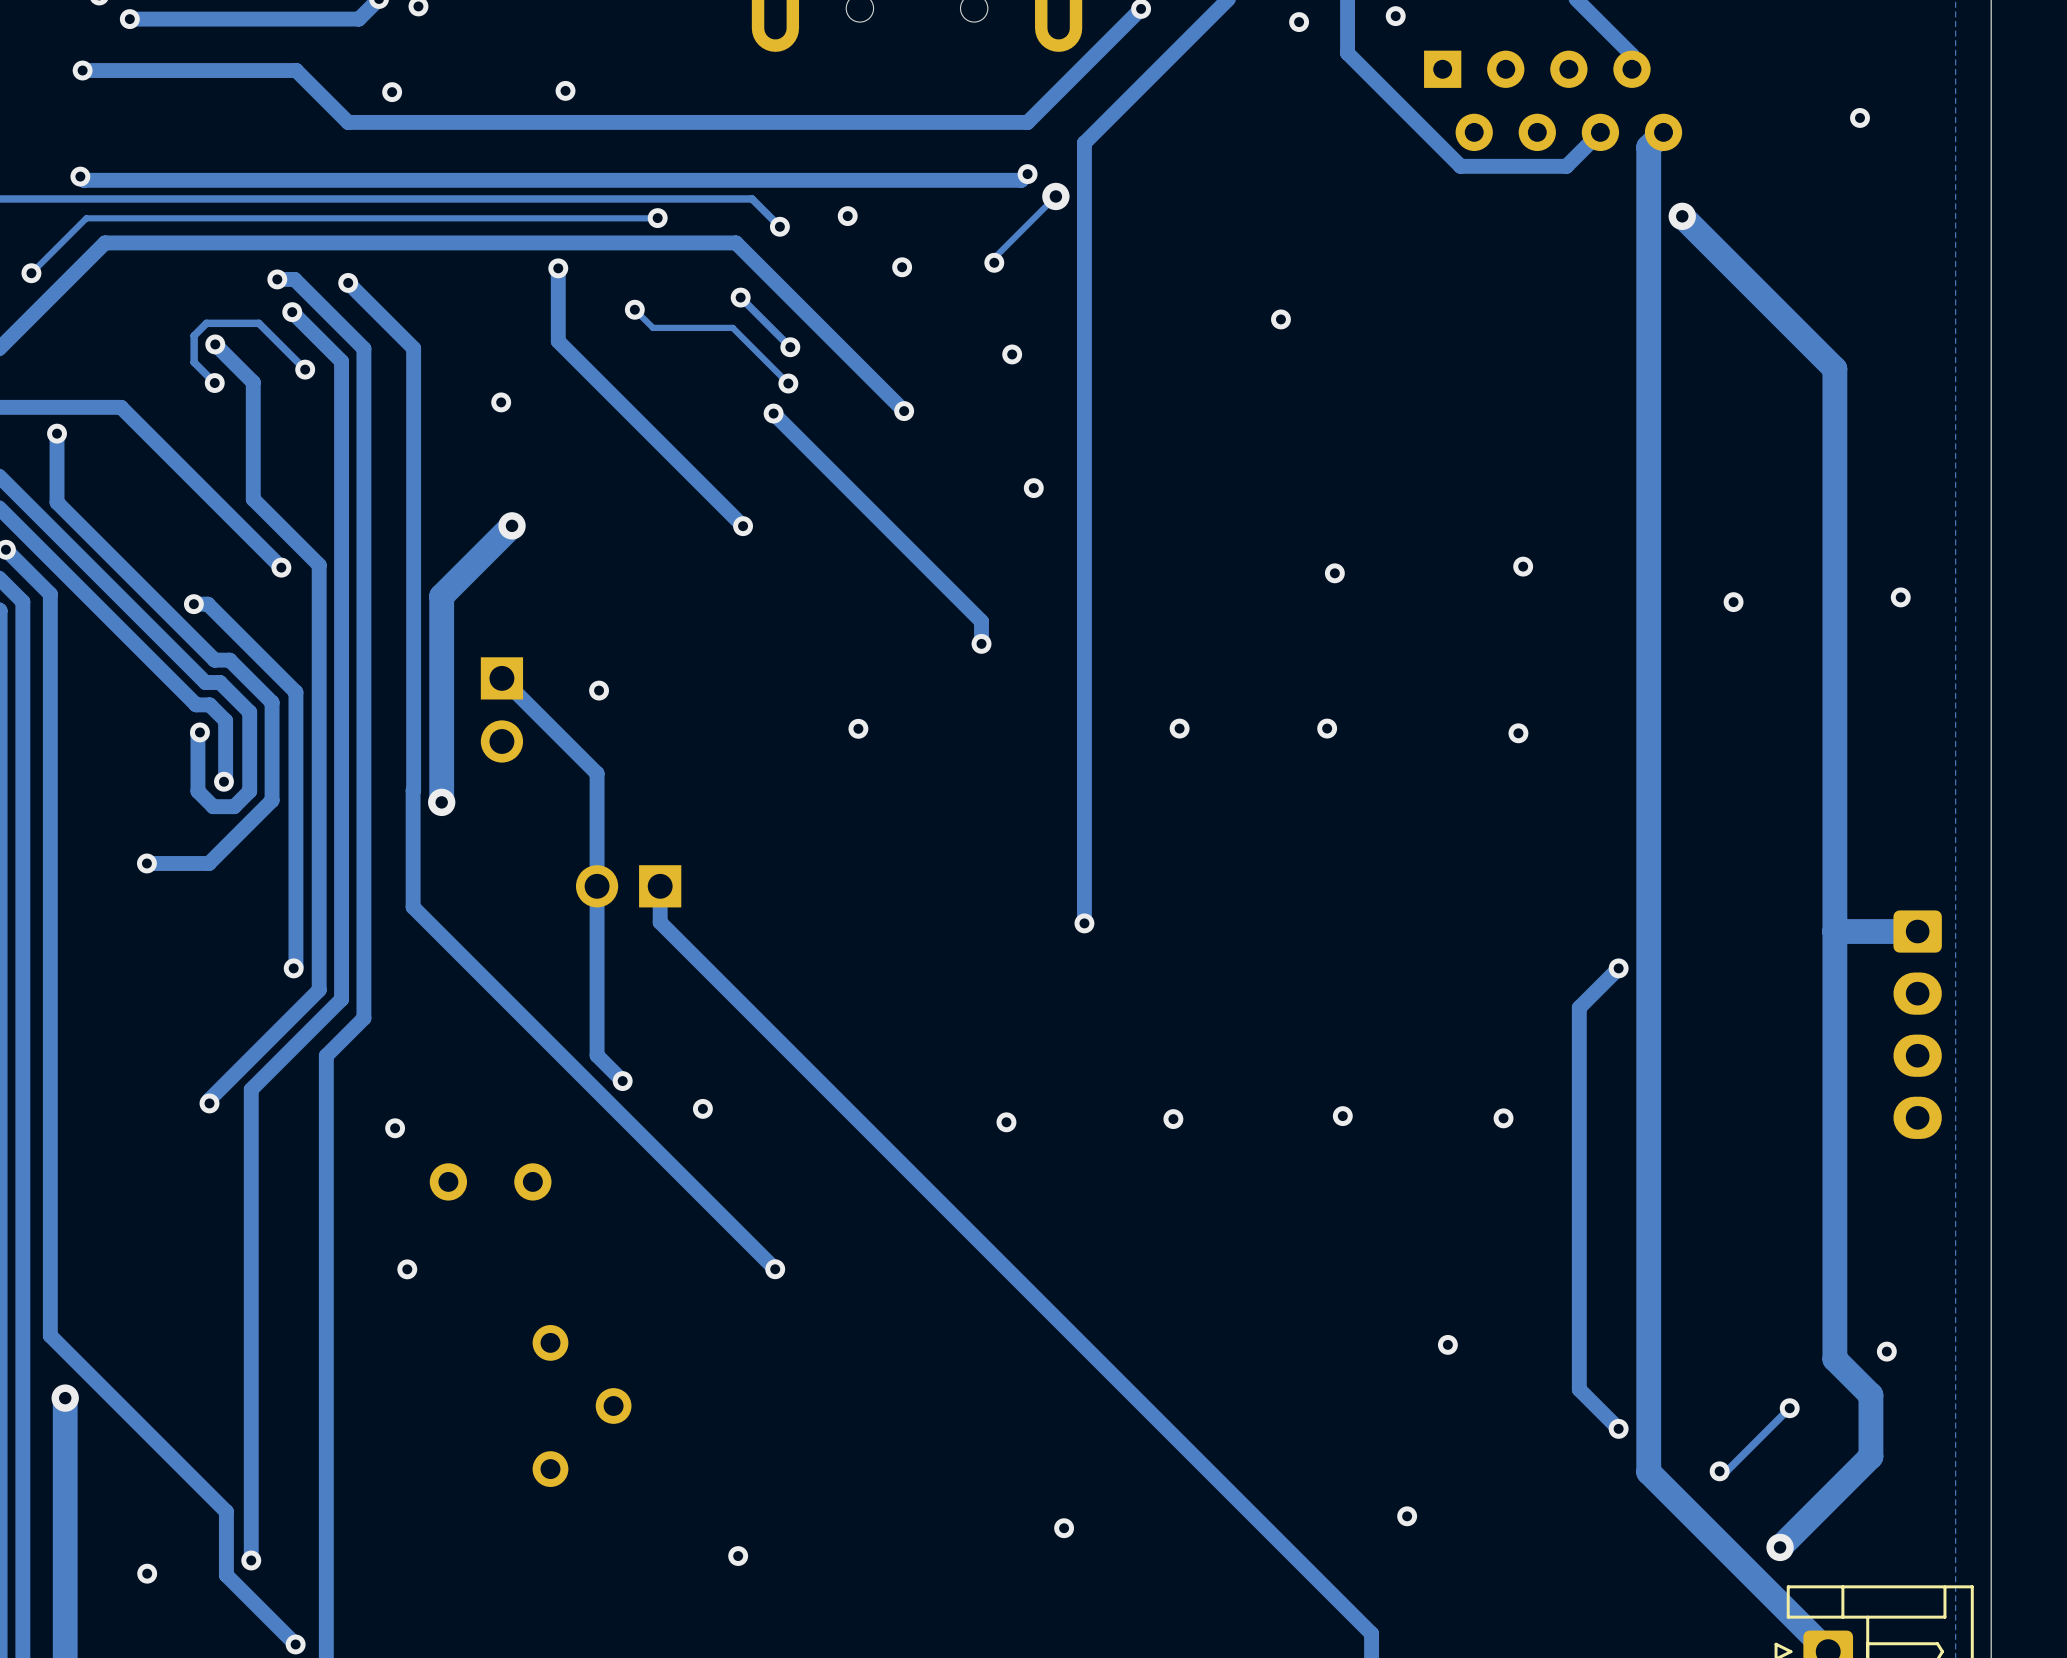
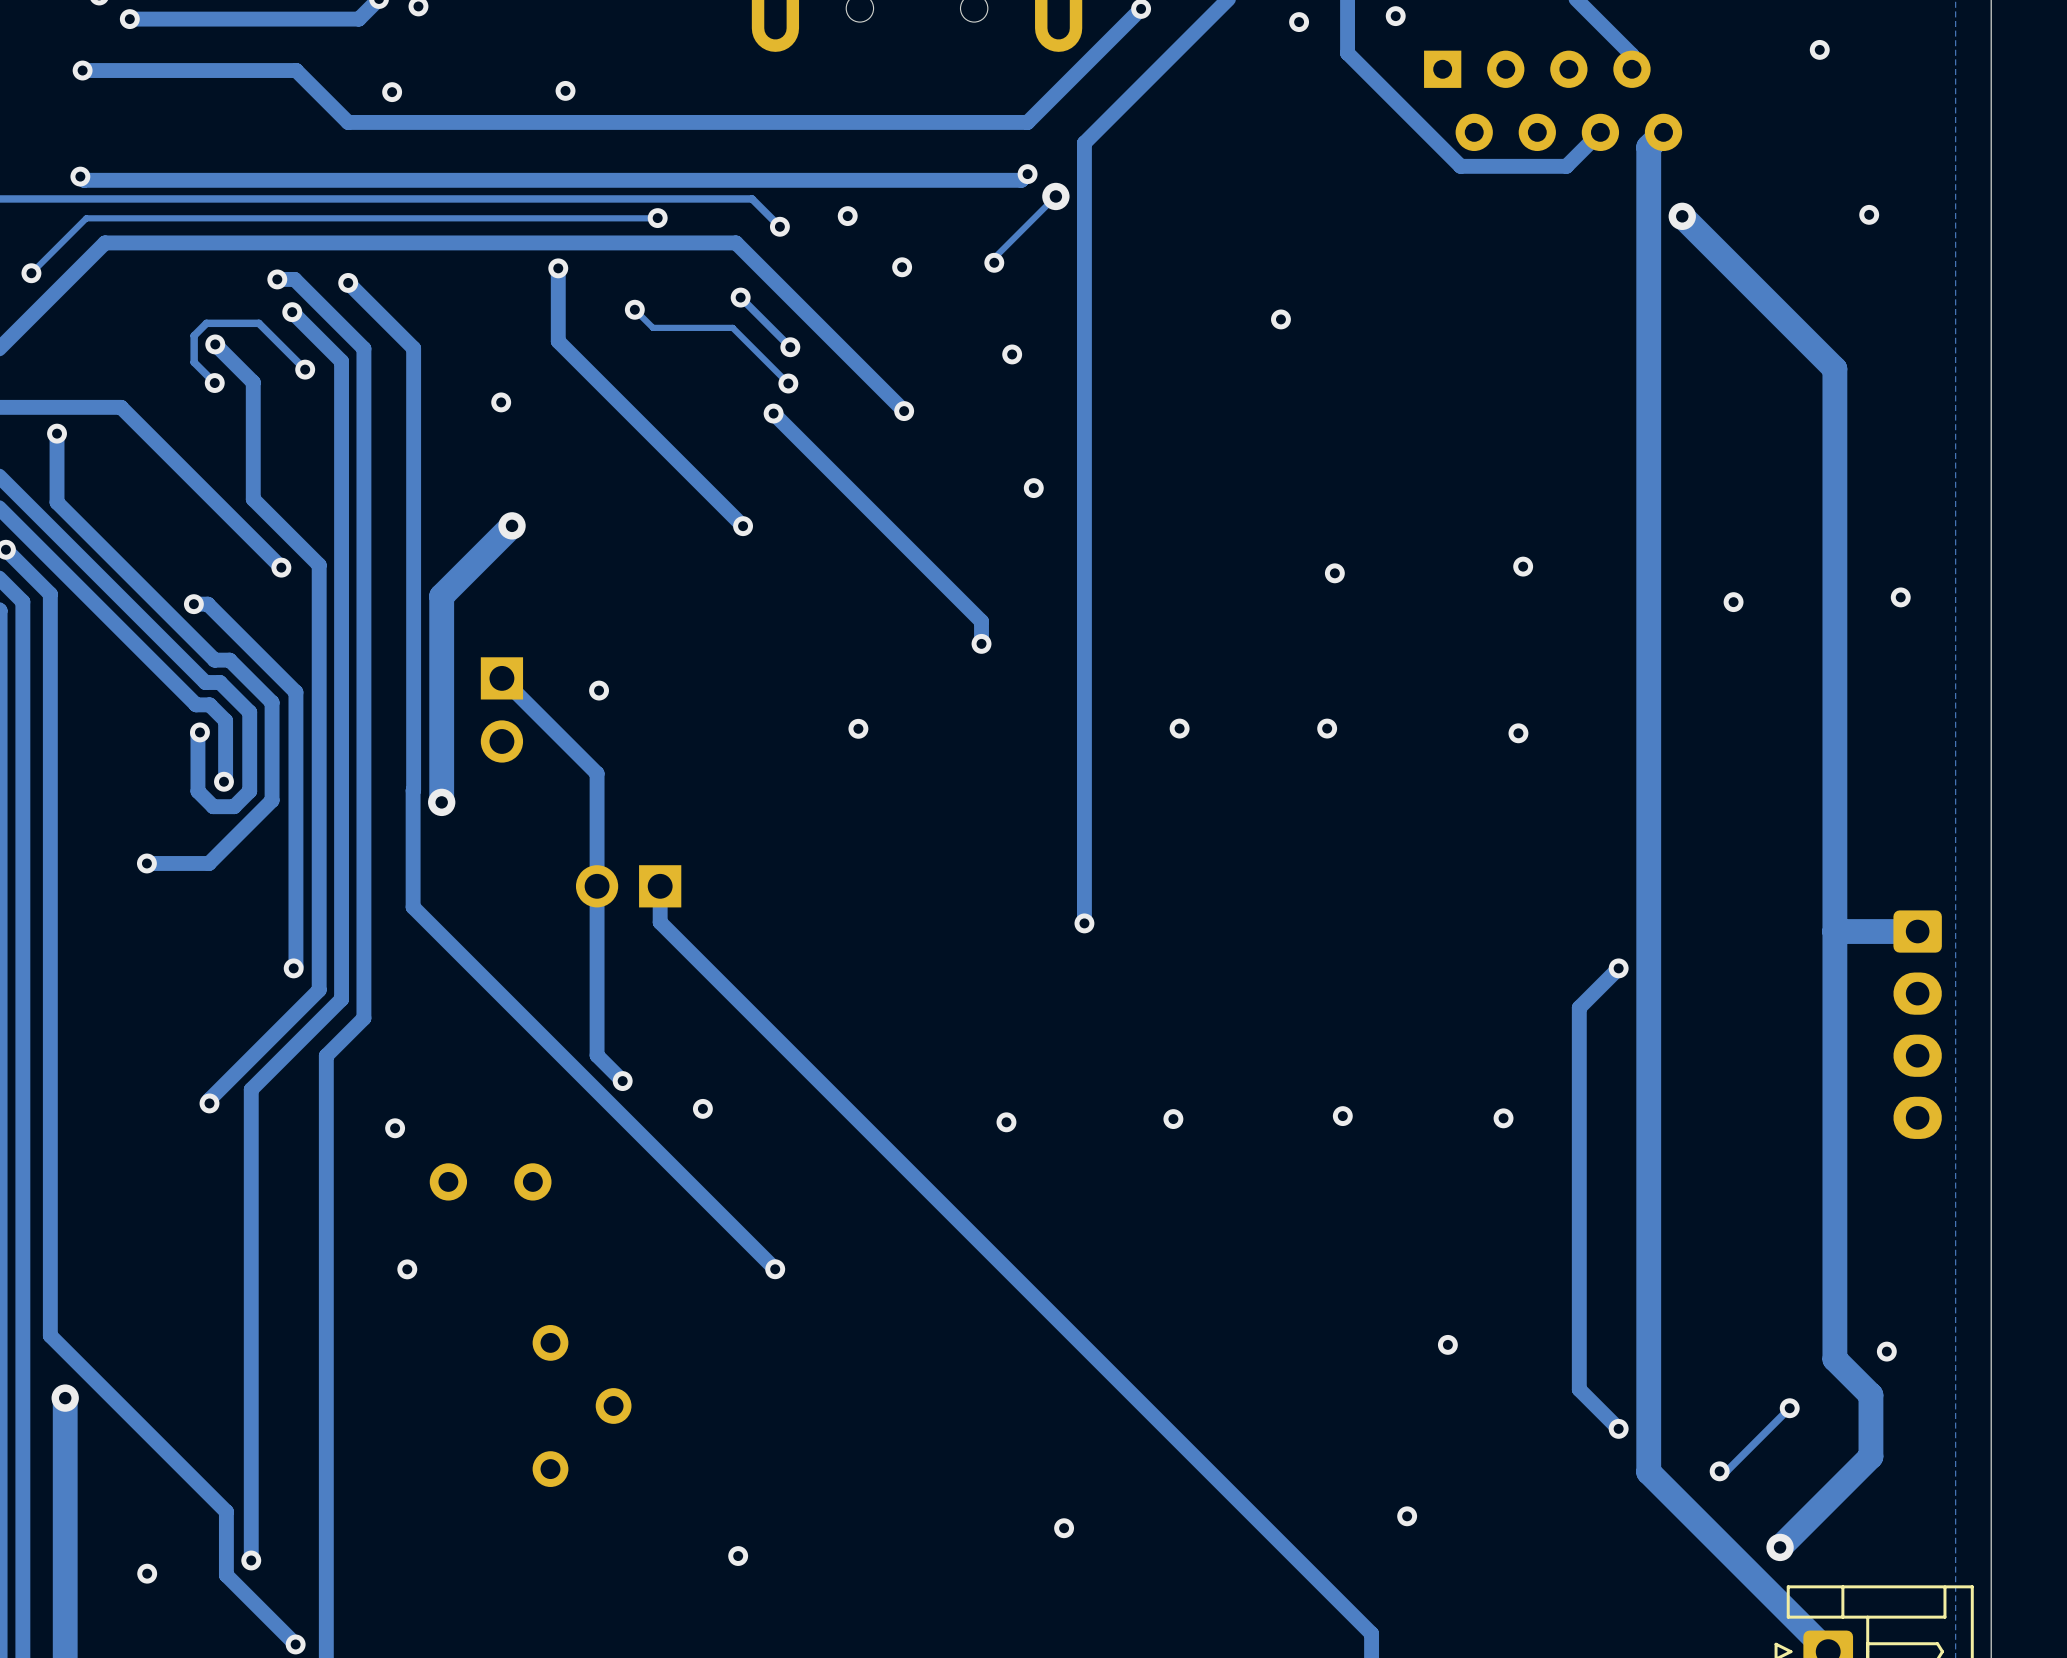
via: none -> (1819, 49)
via: (1860, 117) -> none
via: none -> (1869, 214)

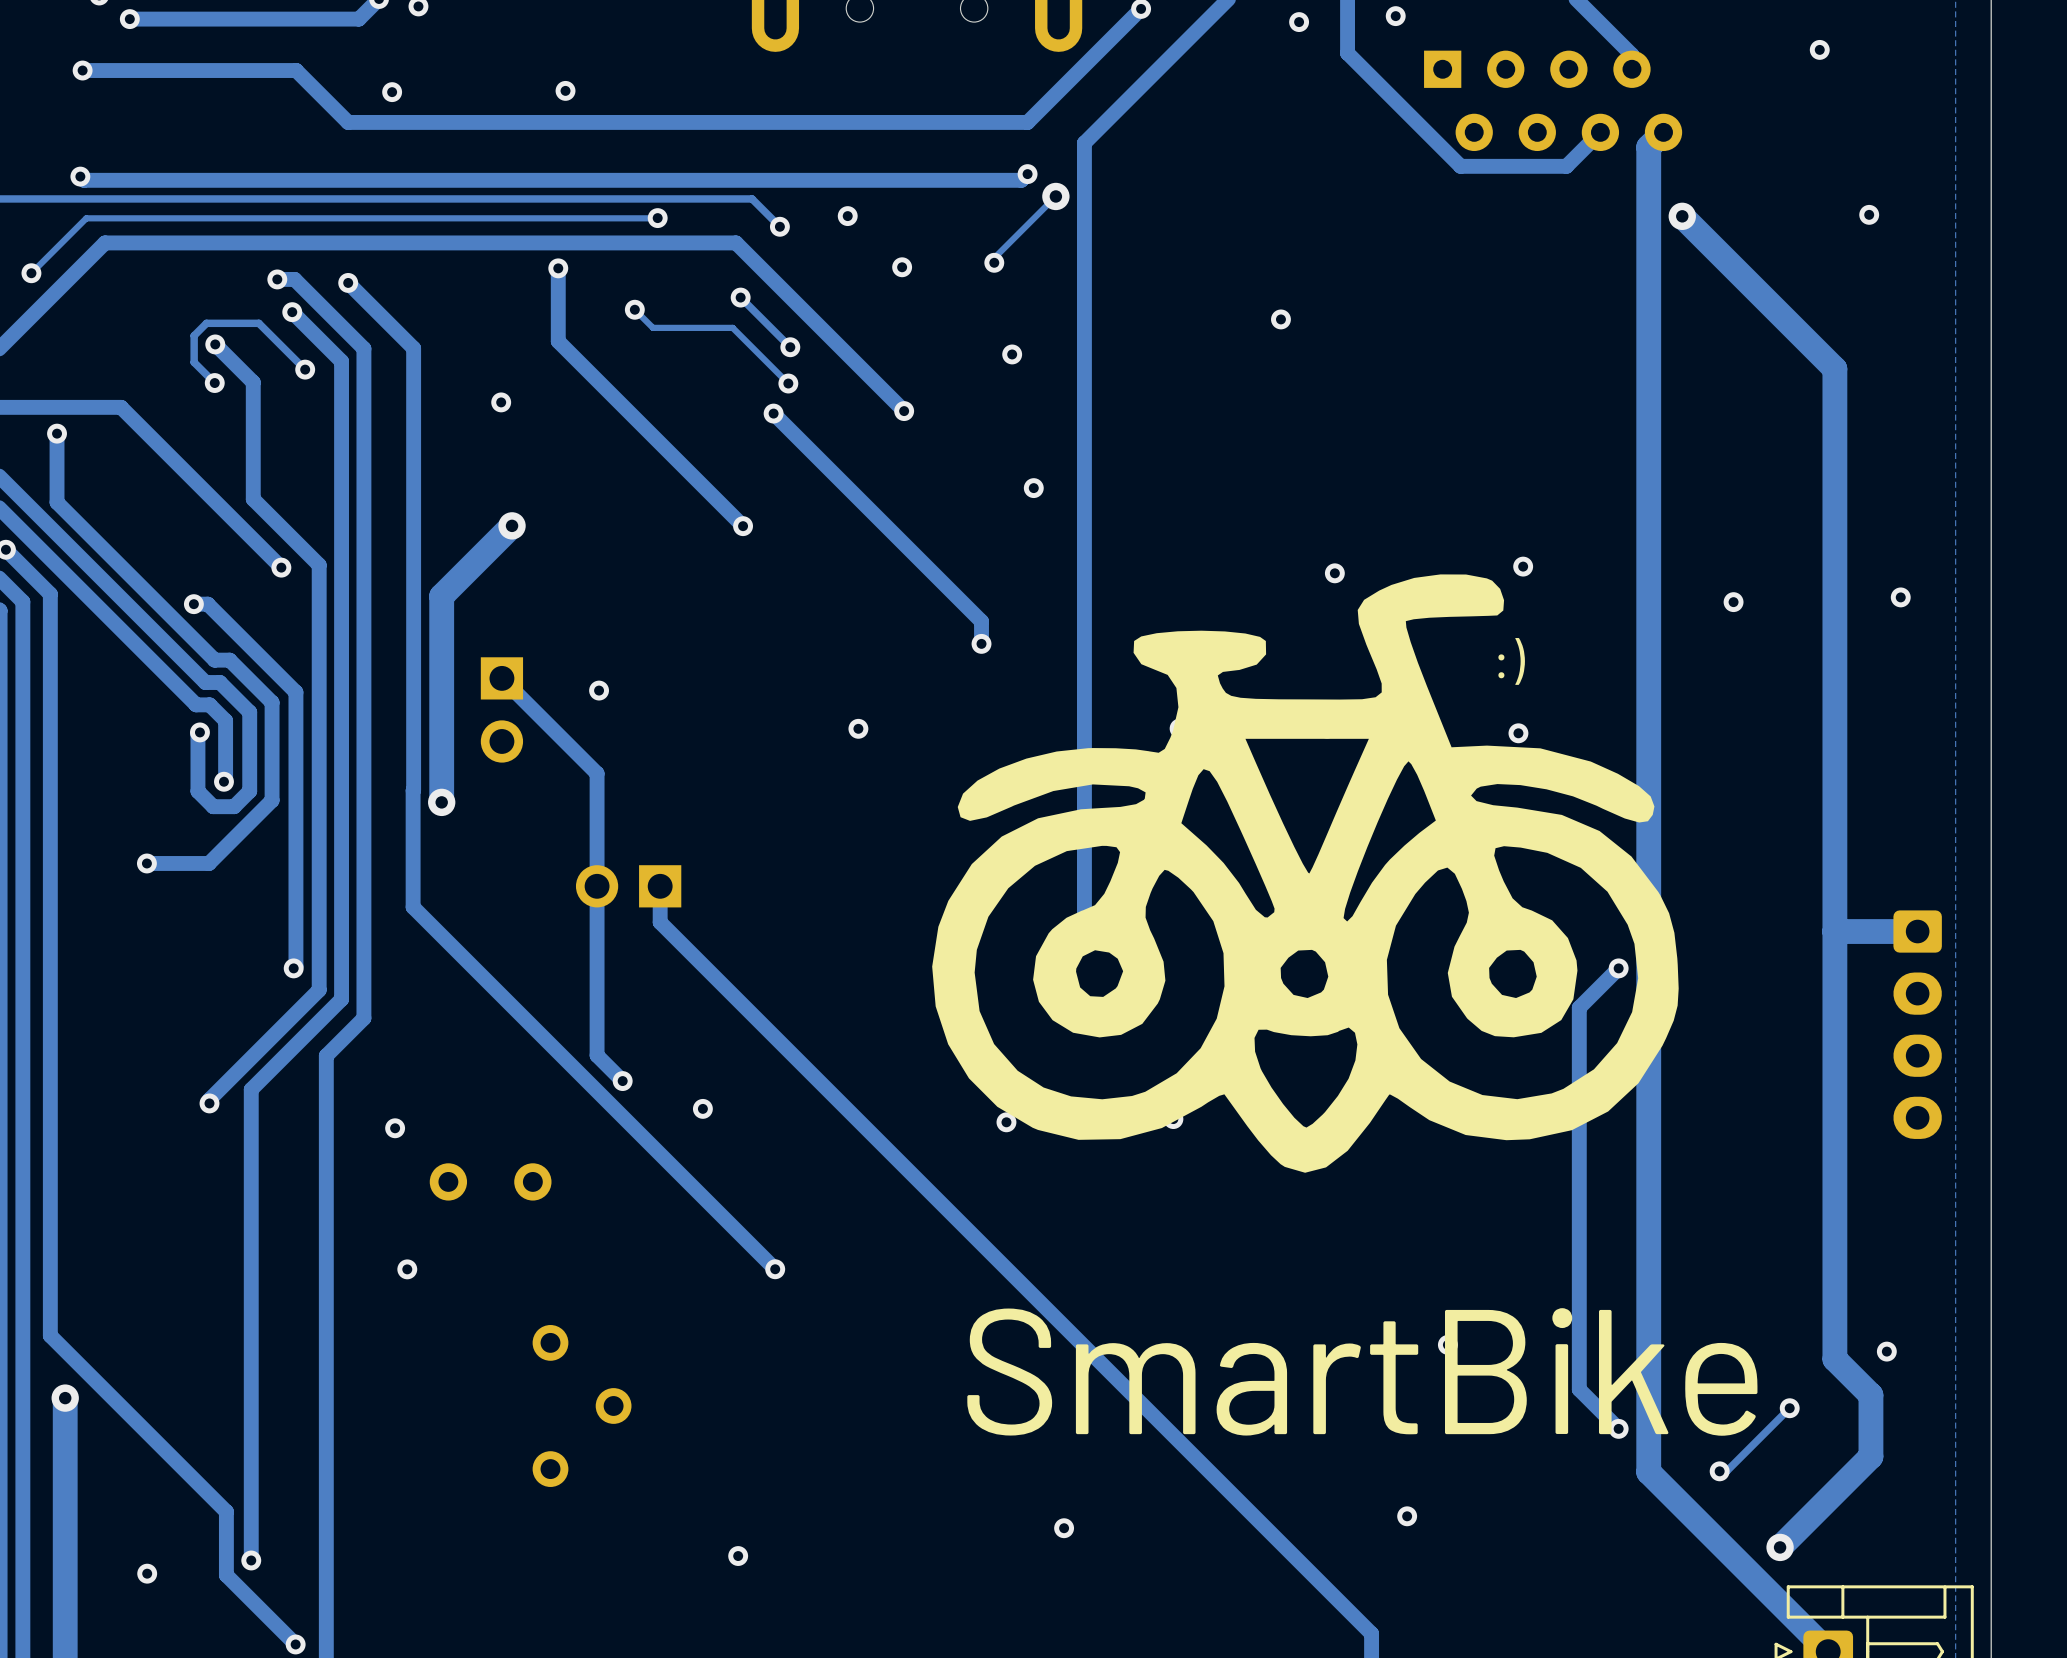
part: none -> (1305, 873)

